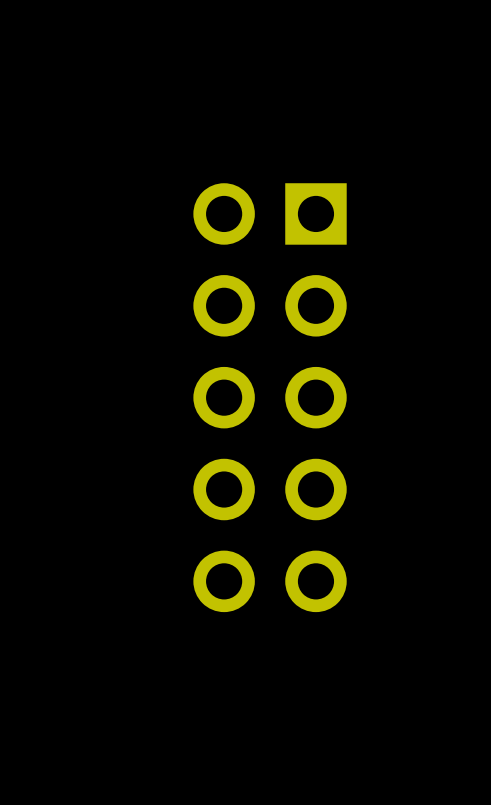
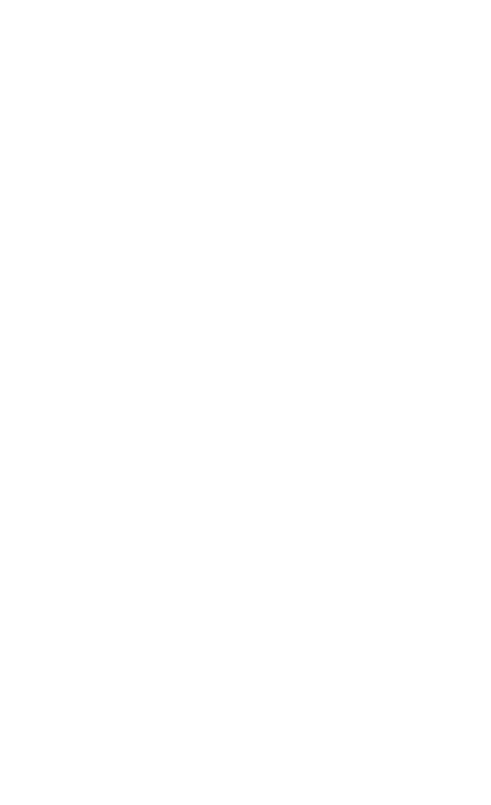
part: (270, 397) -> none

